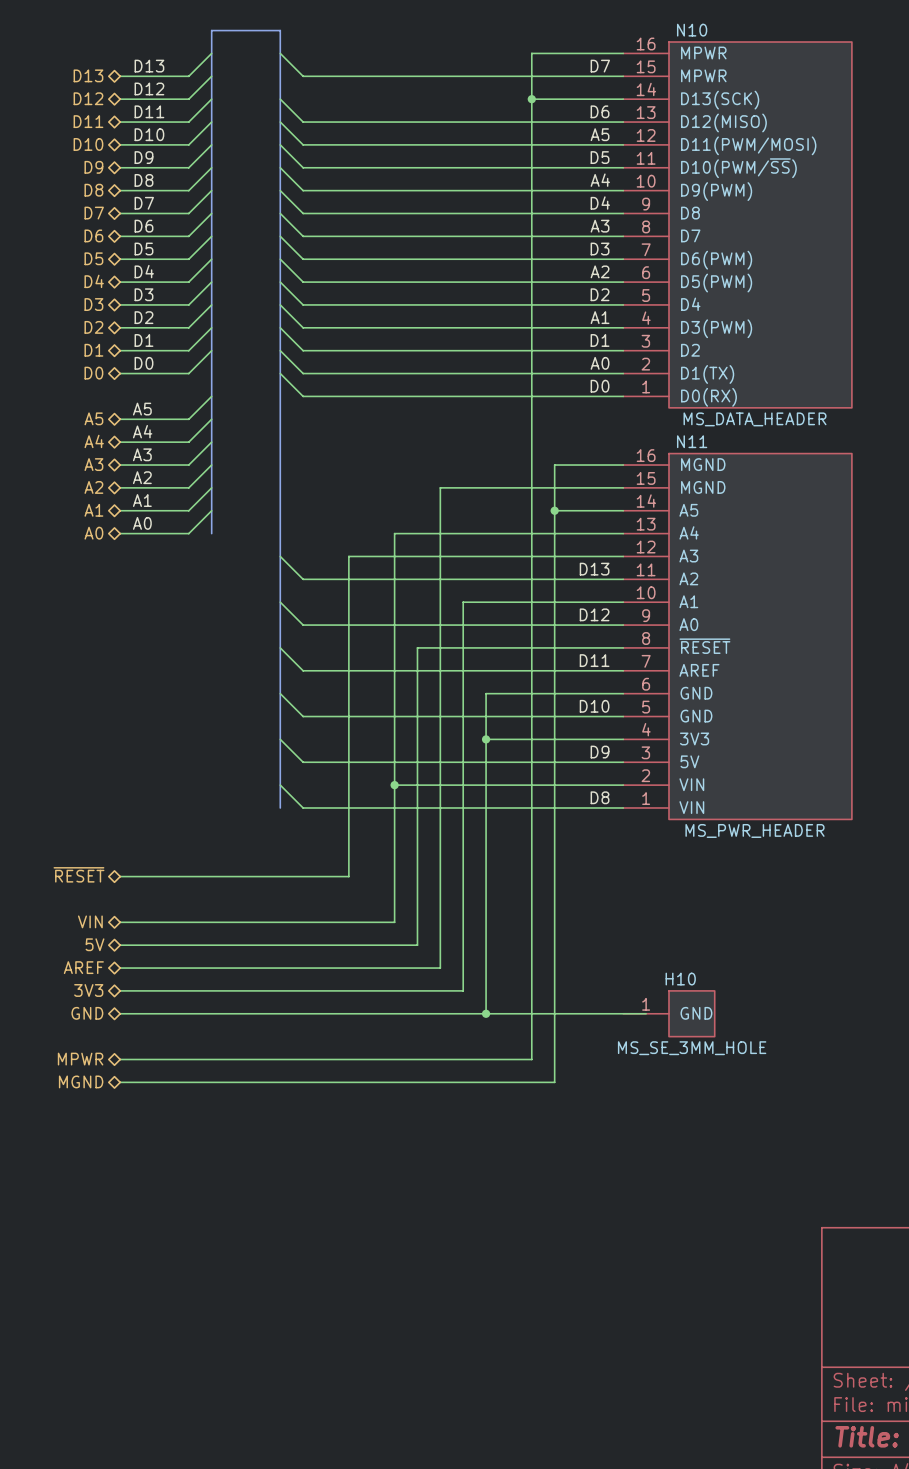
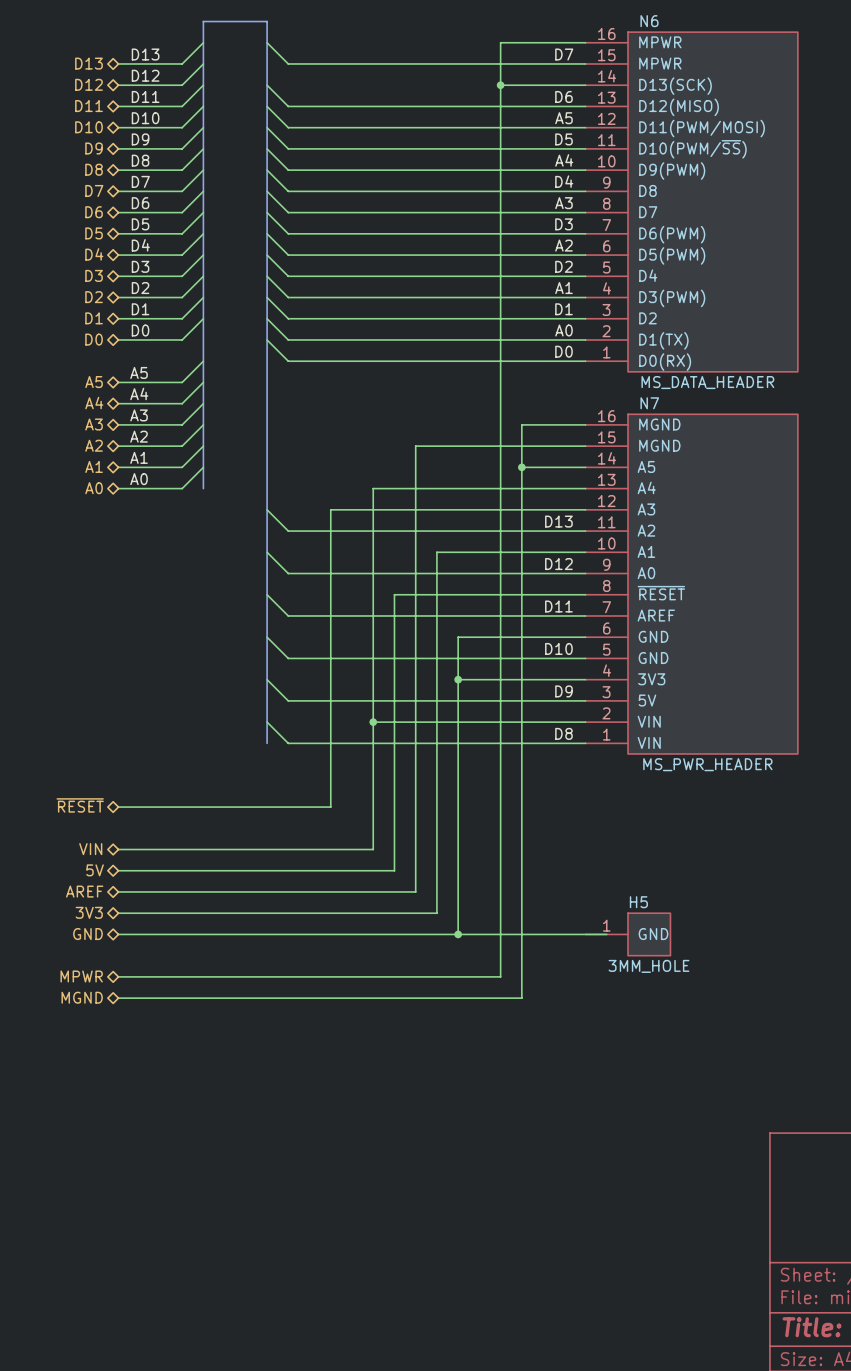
N10 name: N10 (692, 30) -> N6 (649, 21)
N11 name: N11 (692, 441) -> N7 (649, 403)
H10 name: H10 (680, 979) -> H5 (638, 902)
H10 value: MS_SE_3MM_HOLE (692, 1048) -> 3MM_HOLE (648, 966)

